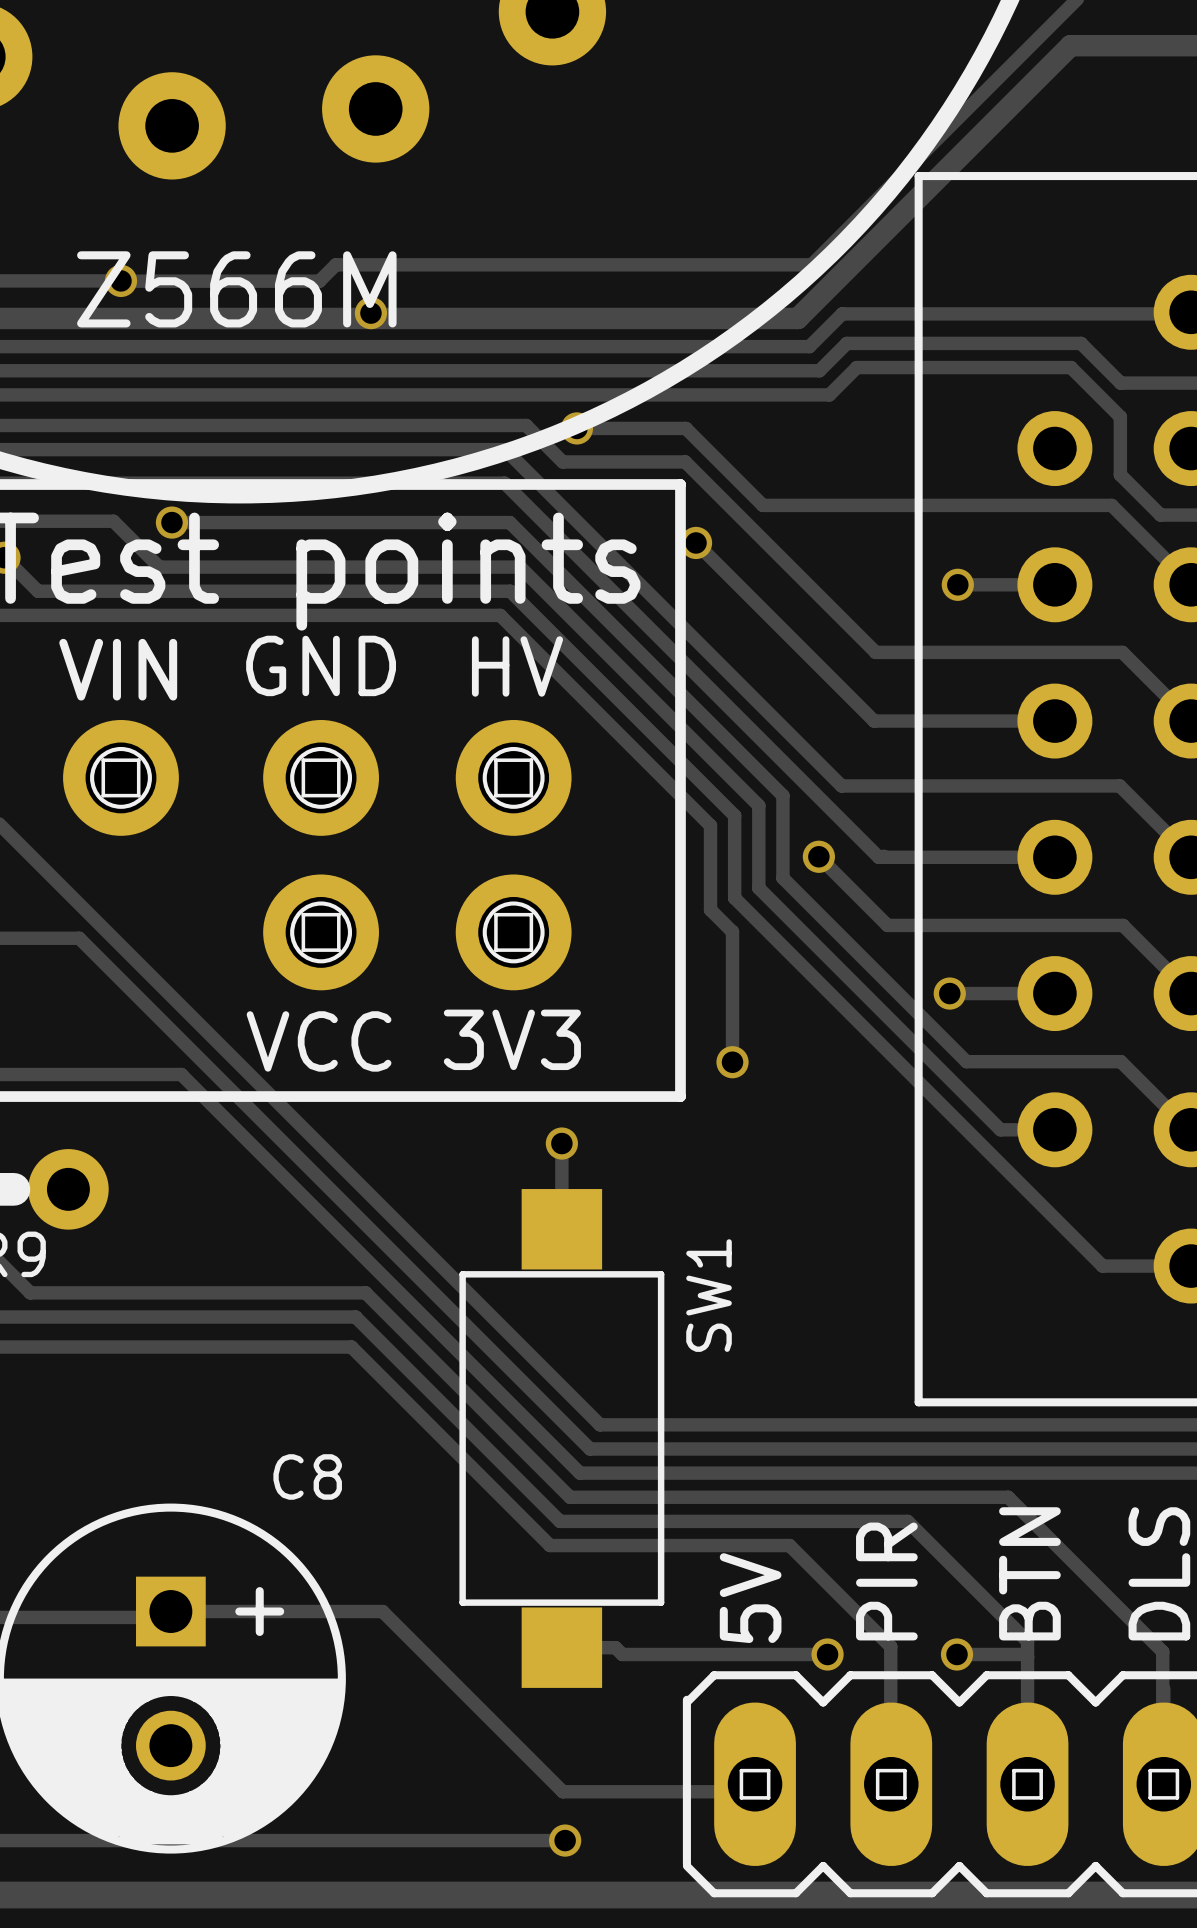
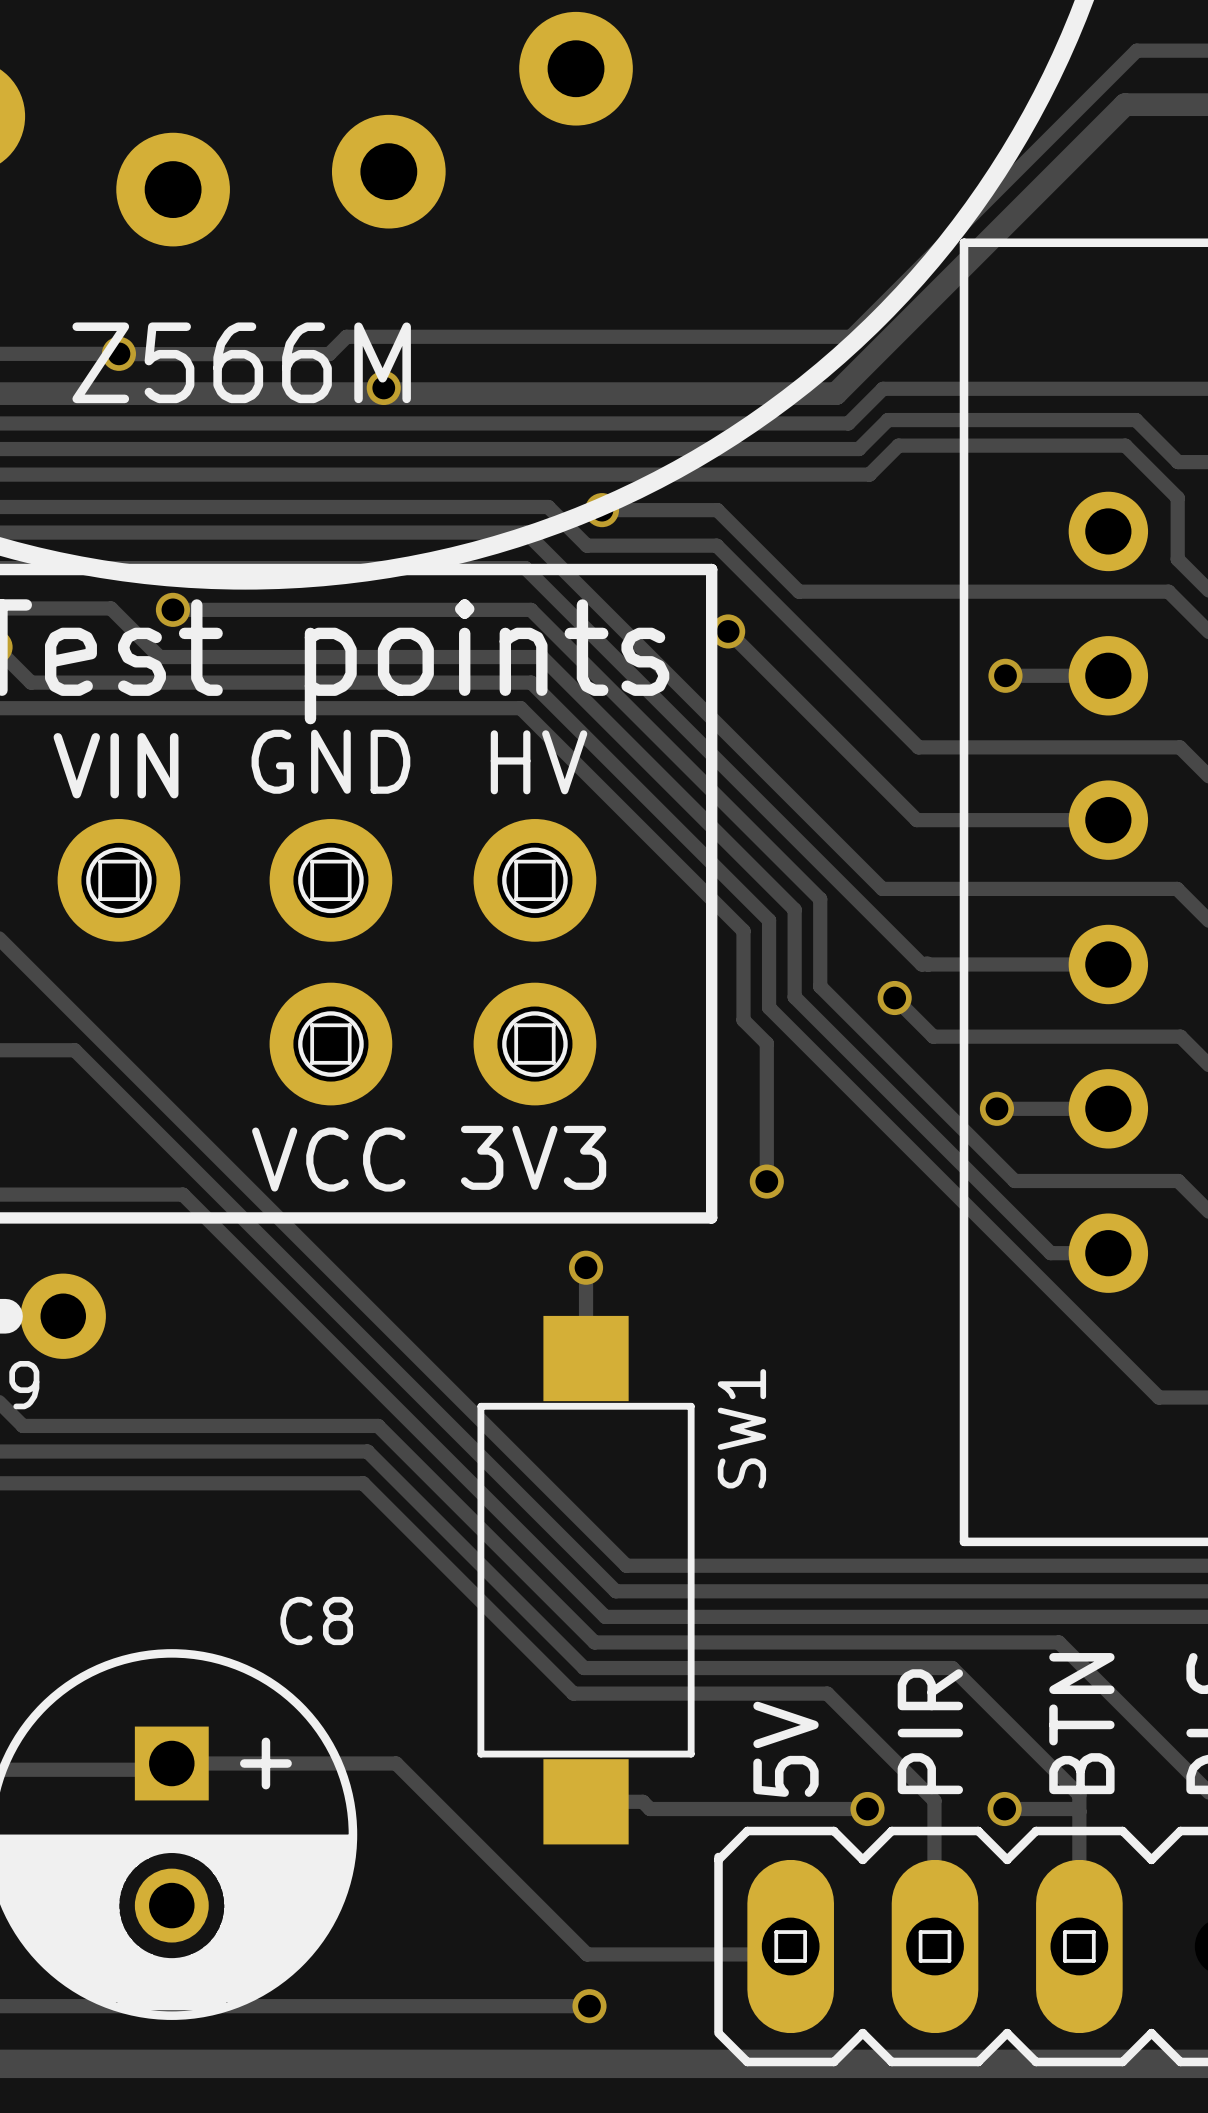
track: (818, 856) (889, 925) -> (894, 998) (933, 1036)
via position: (818, 856) -> (894, 998)

